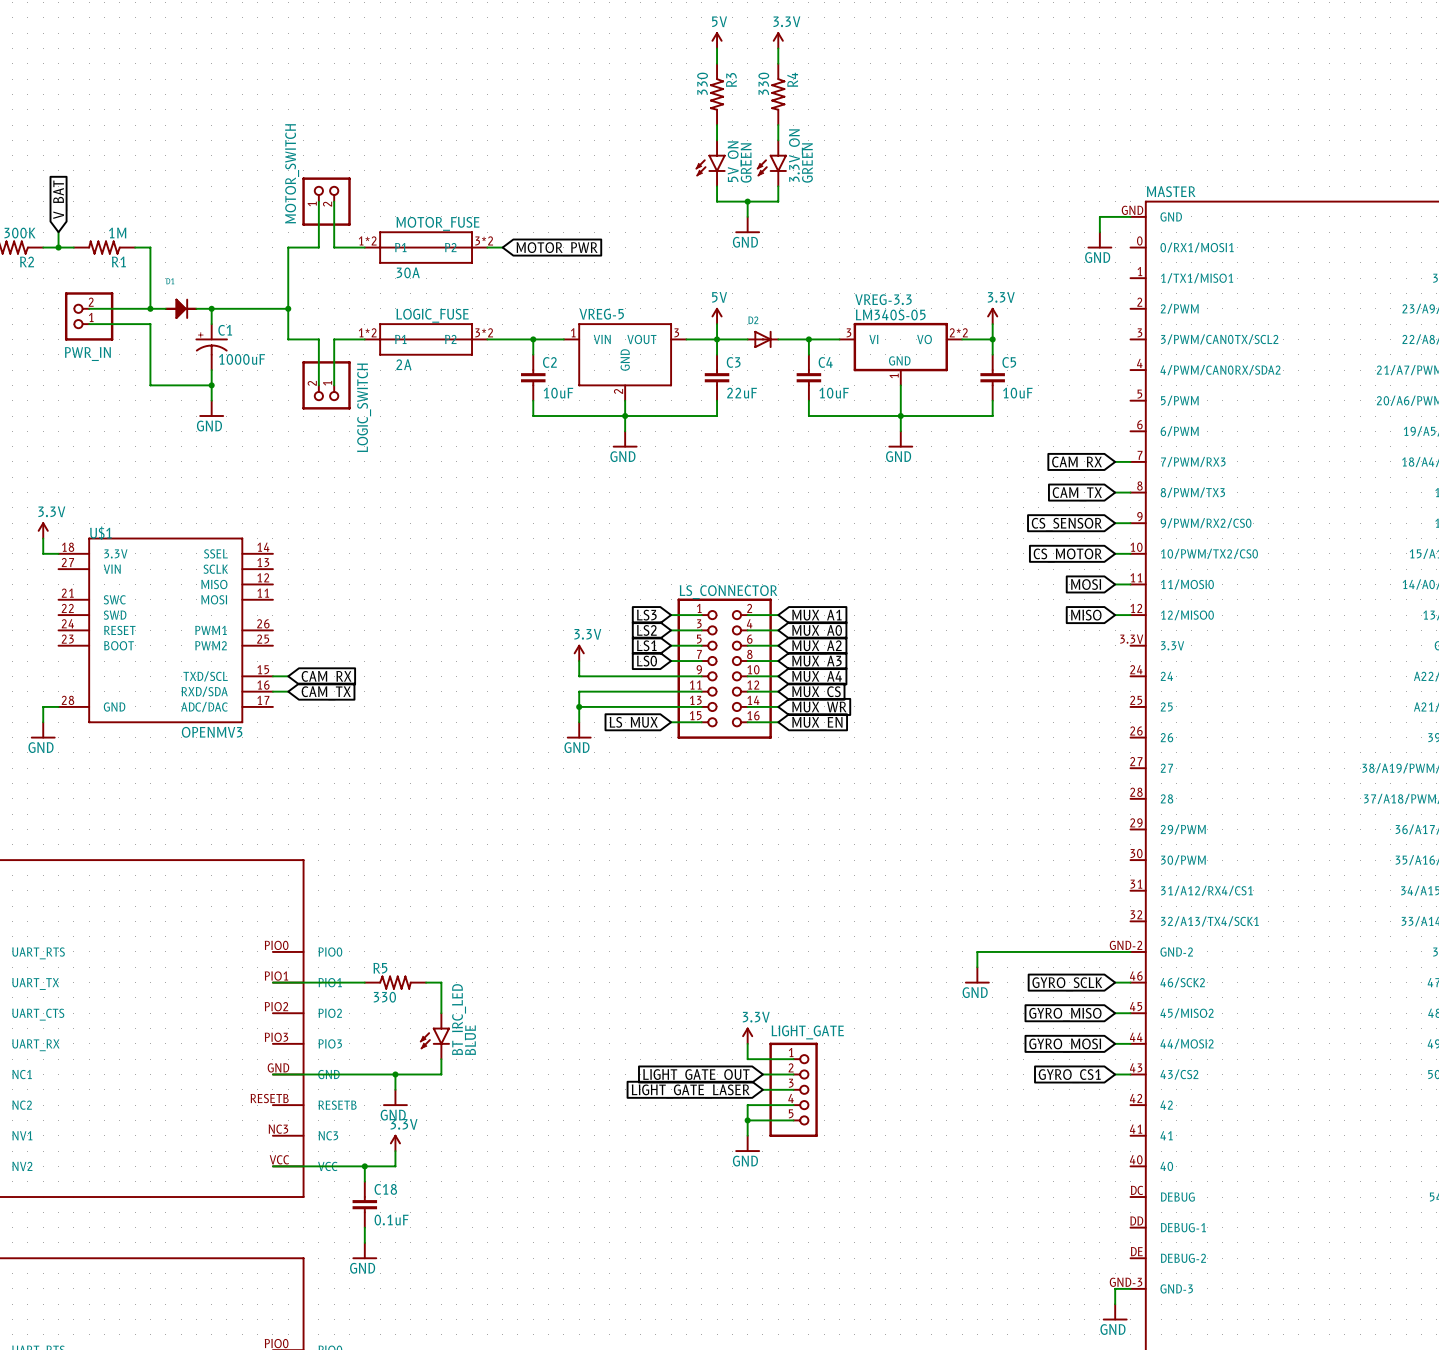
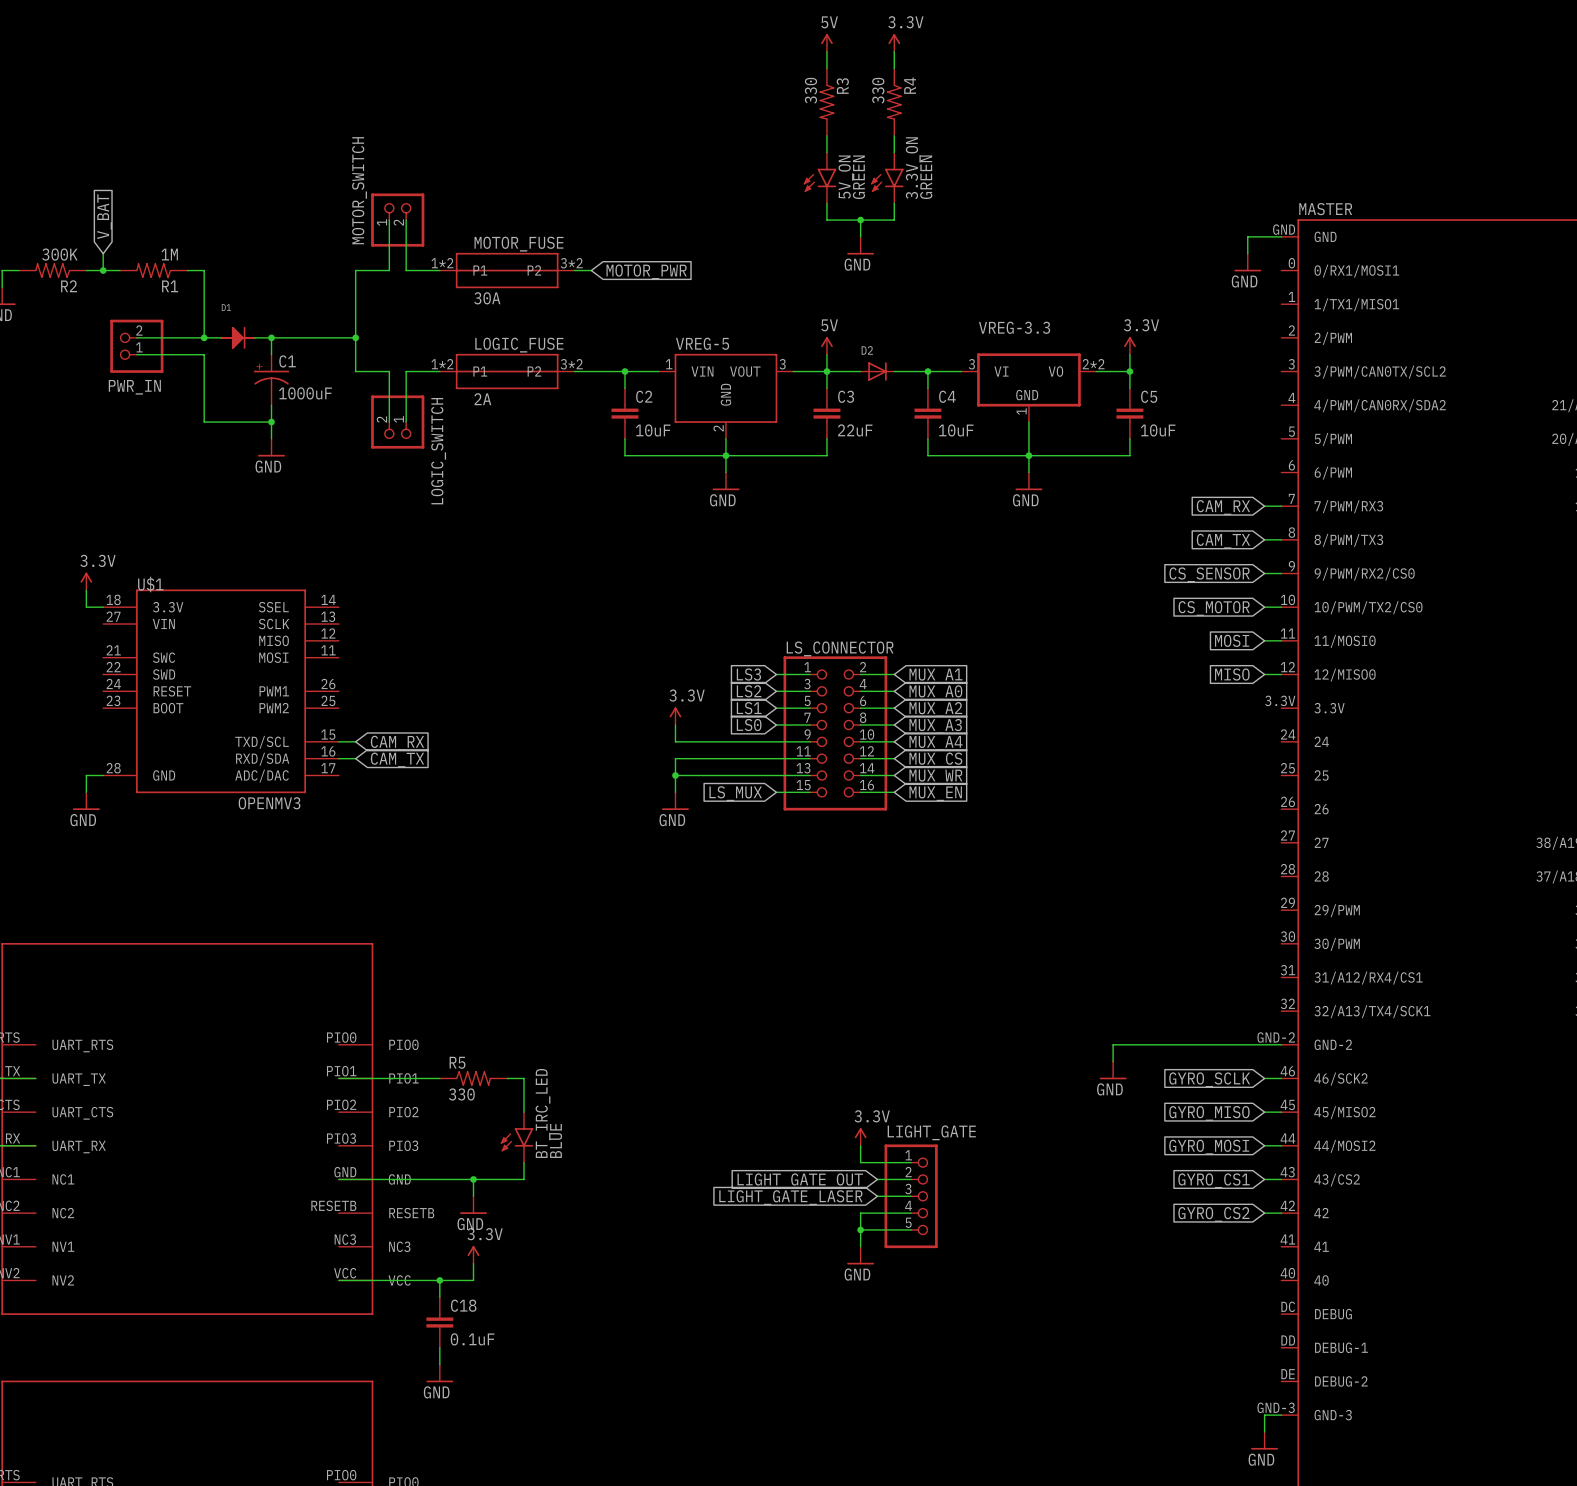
VREG-3.3 value: LM340S-05 (890, 314) -> none
wire: none -> (1264, 1213) (1281, 1213)
global label: none -> GYRO_CS2 (1213, 1214)

